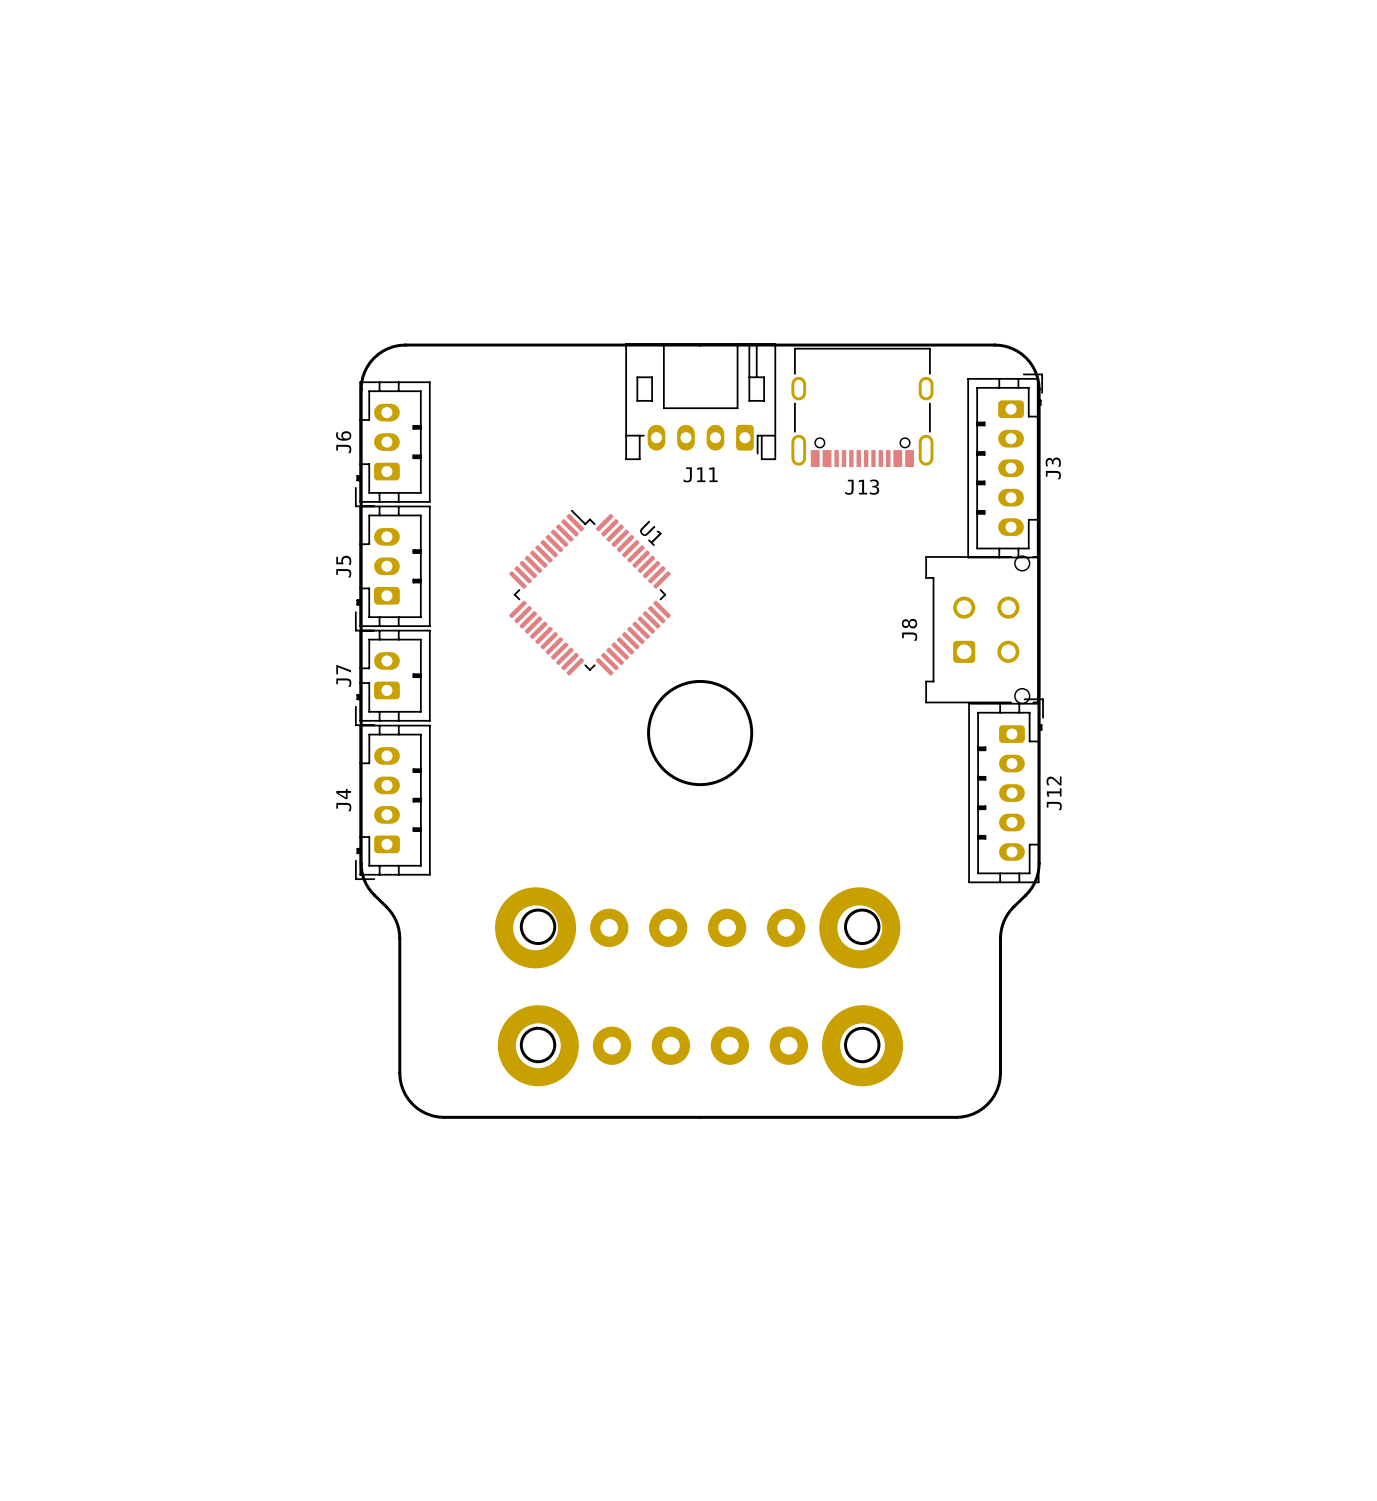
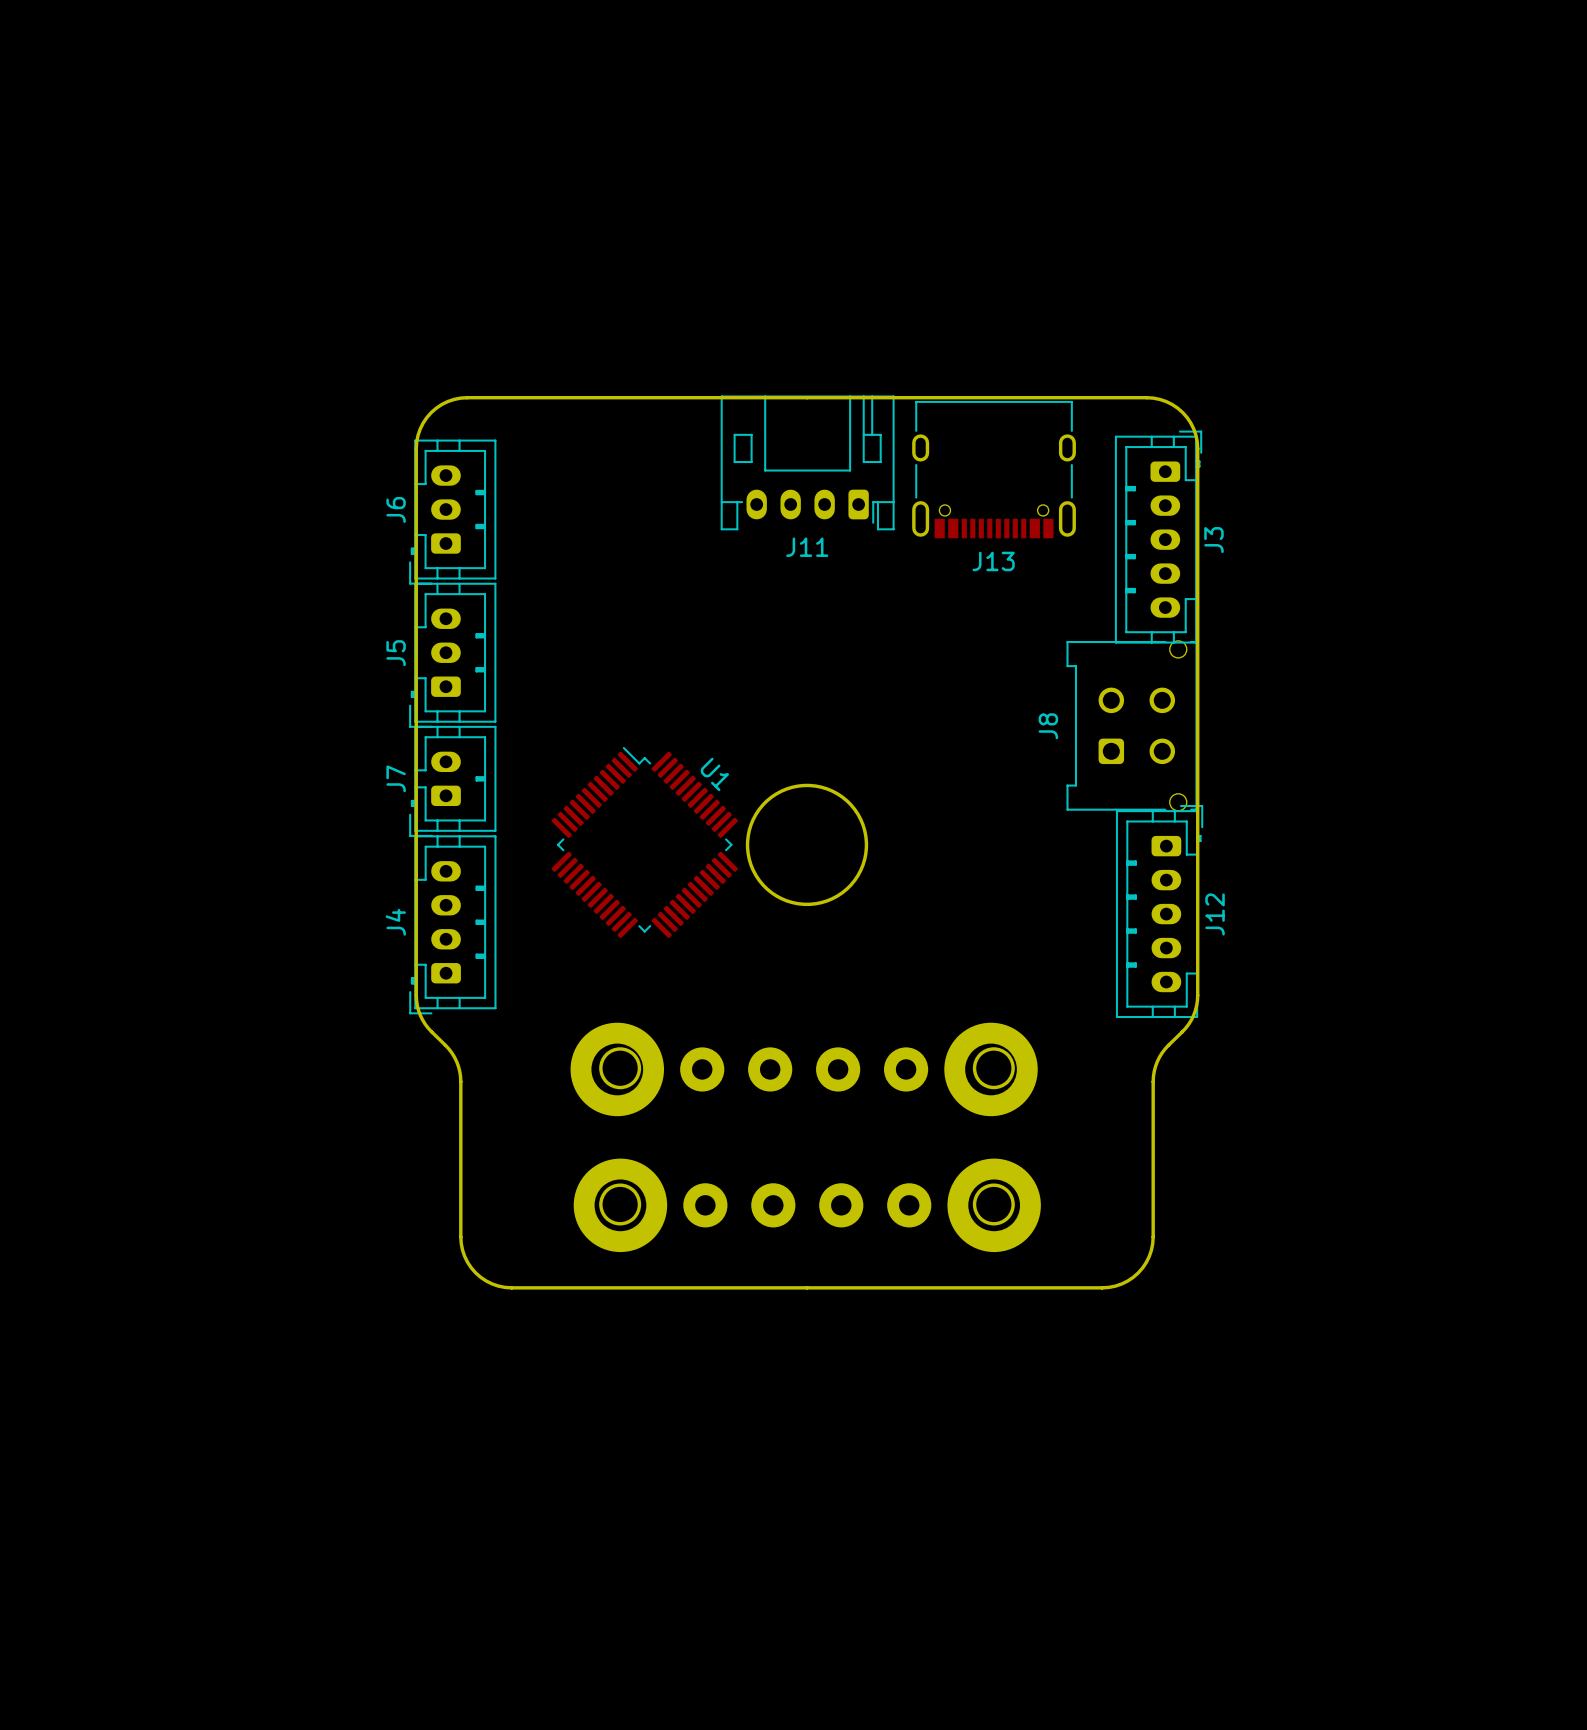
U1 position: (589, 592) -> (644, 842)

